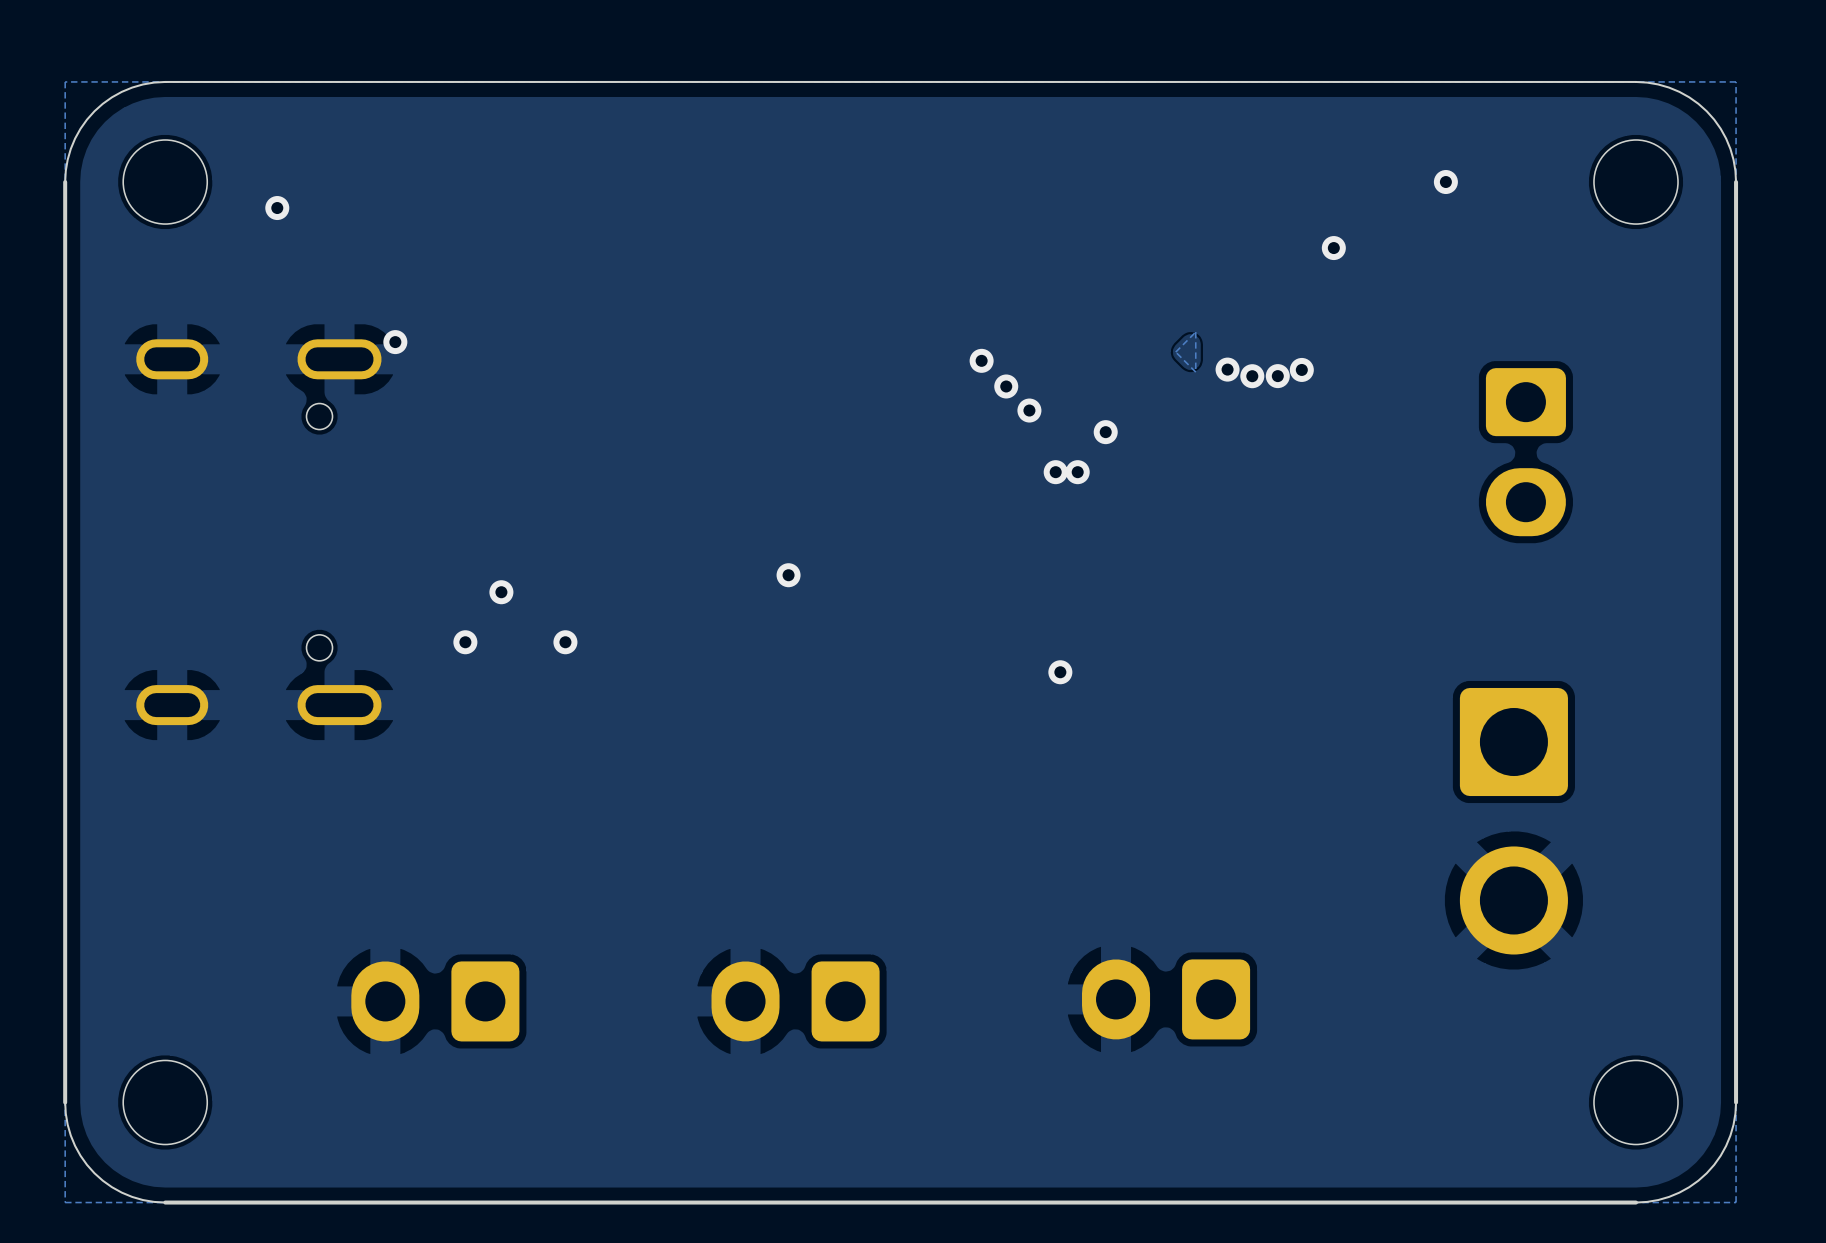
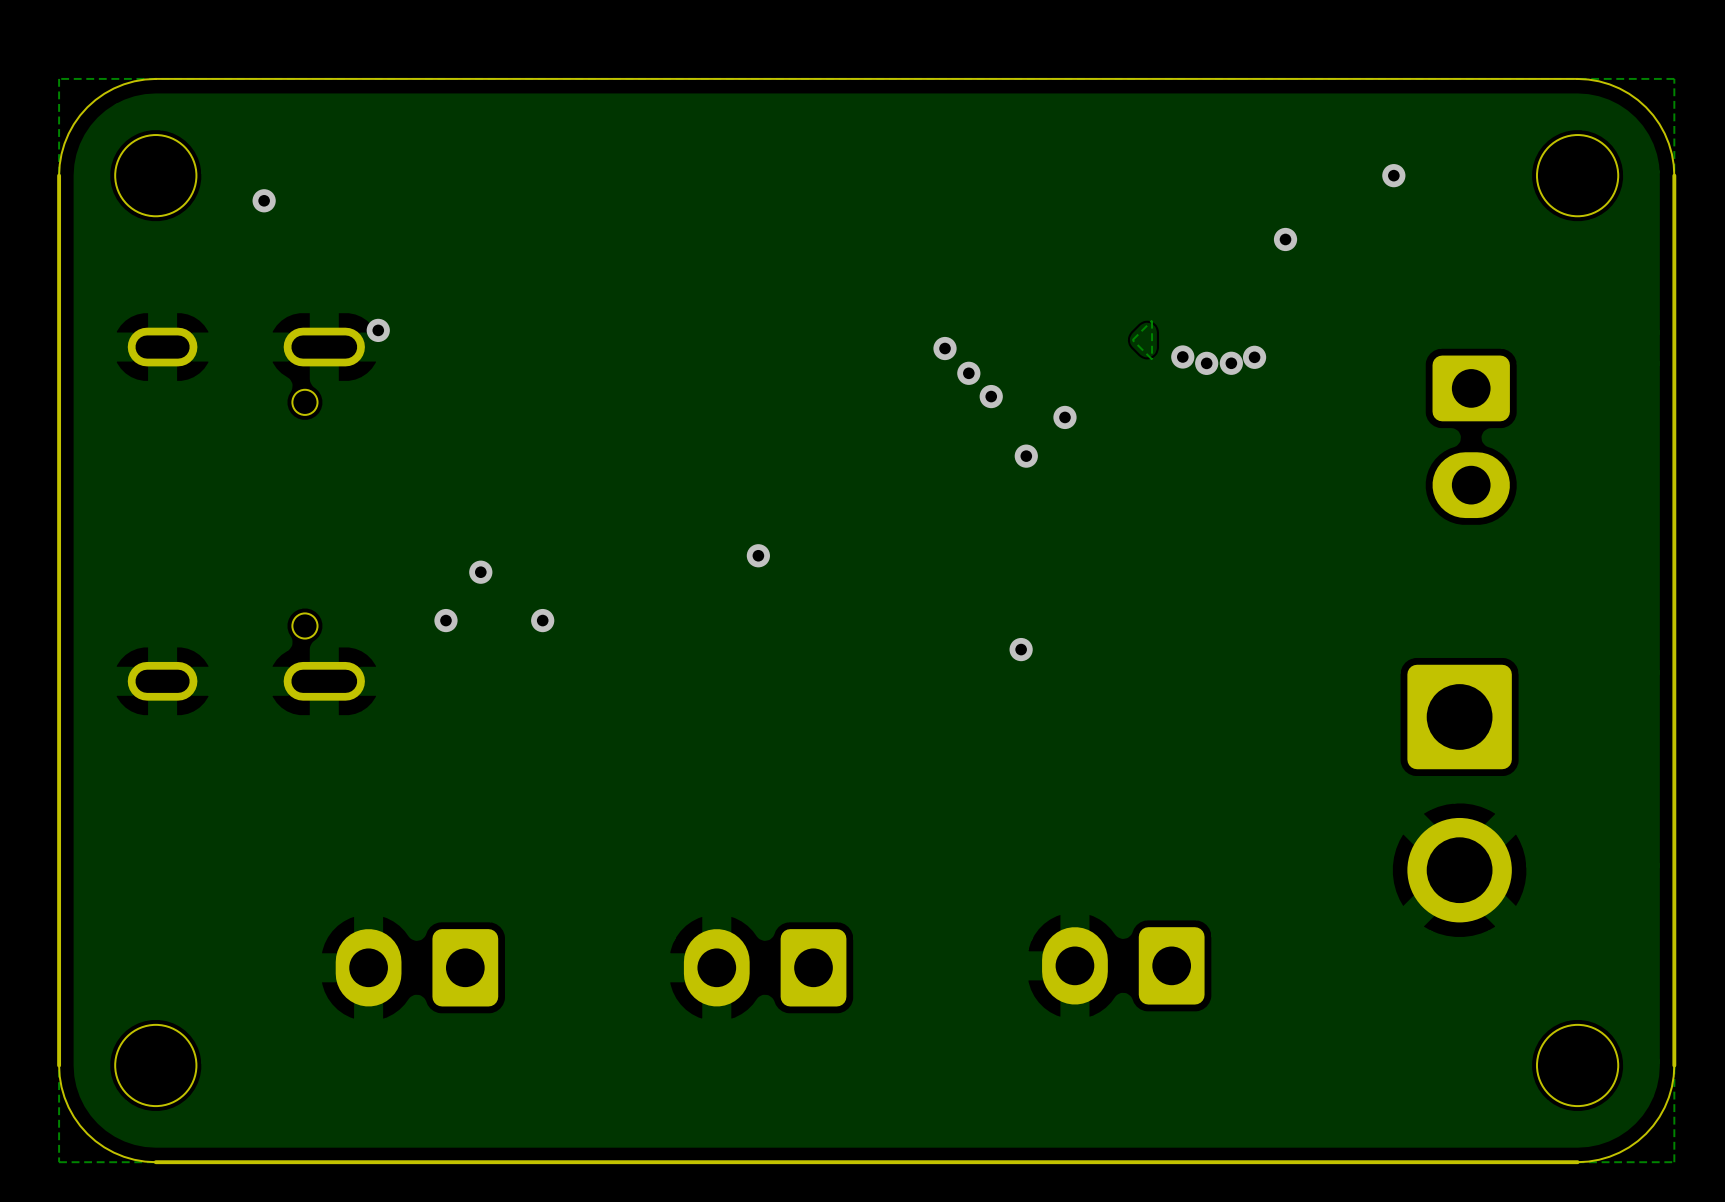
via: (1055, 472) -> none
via: none -> (1026, 456)
via: (1077, 472) -> none

